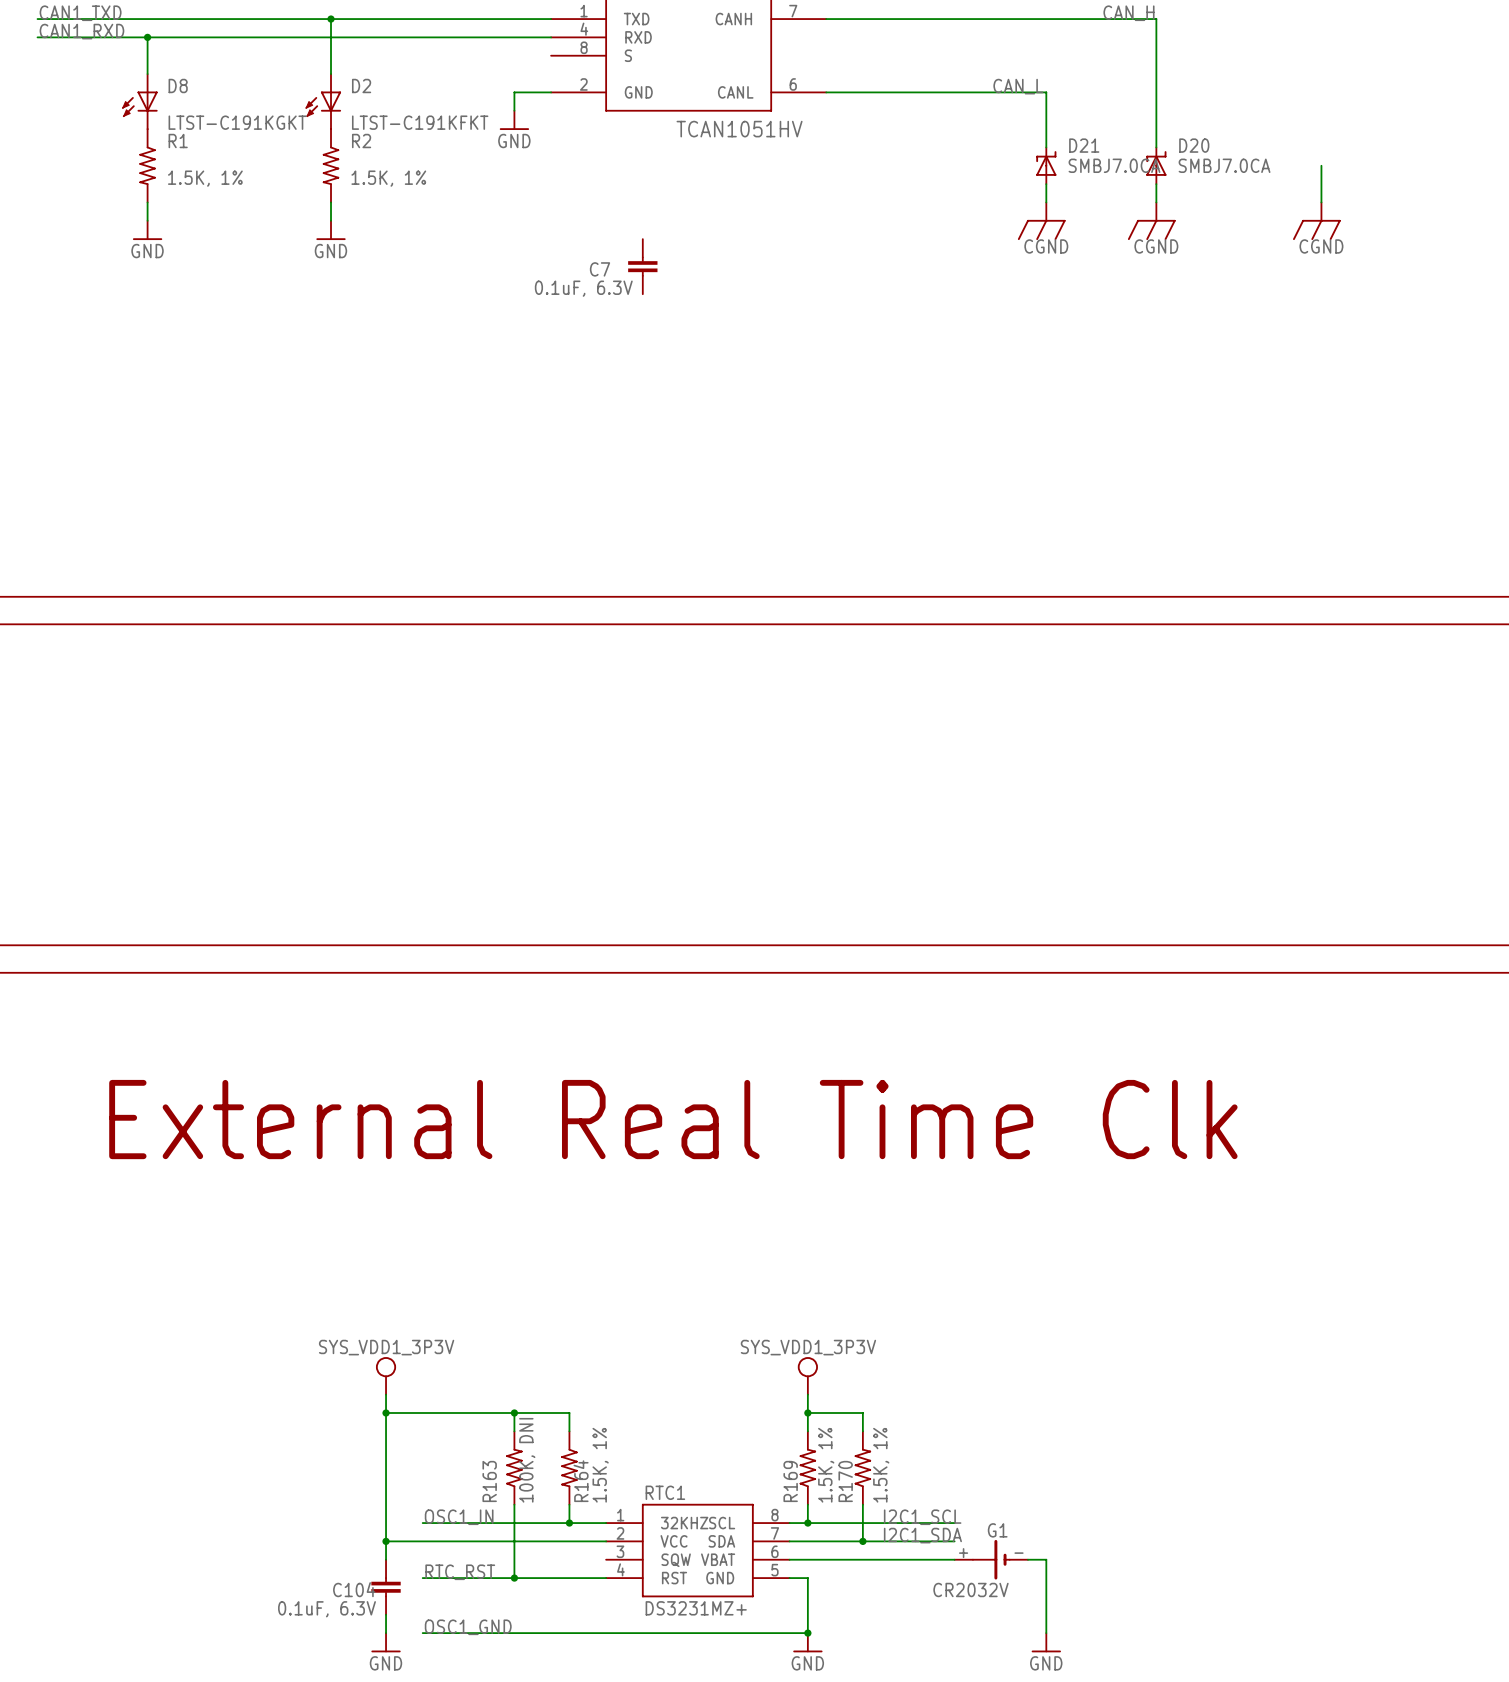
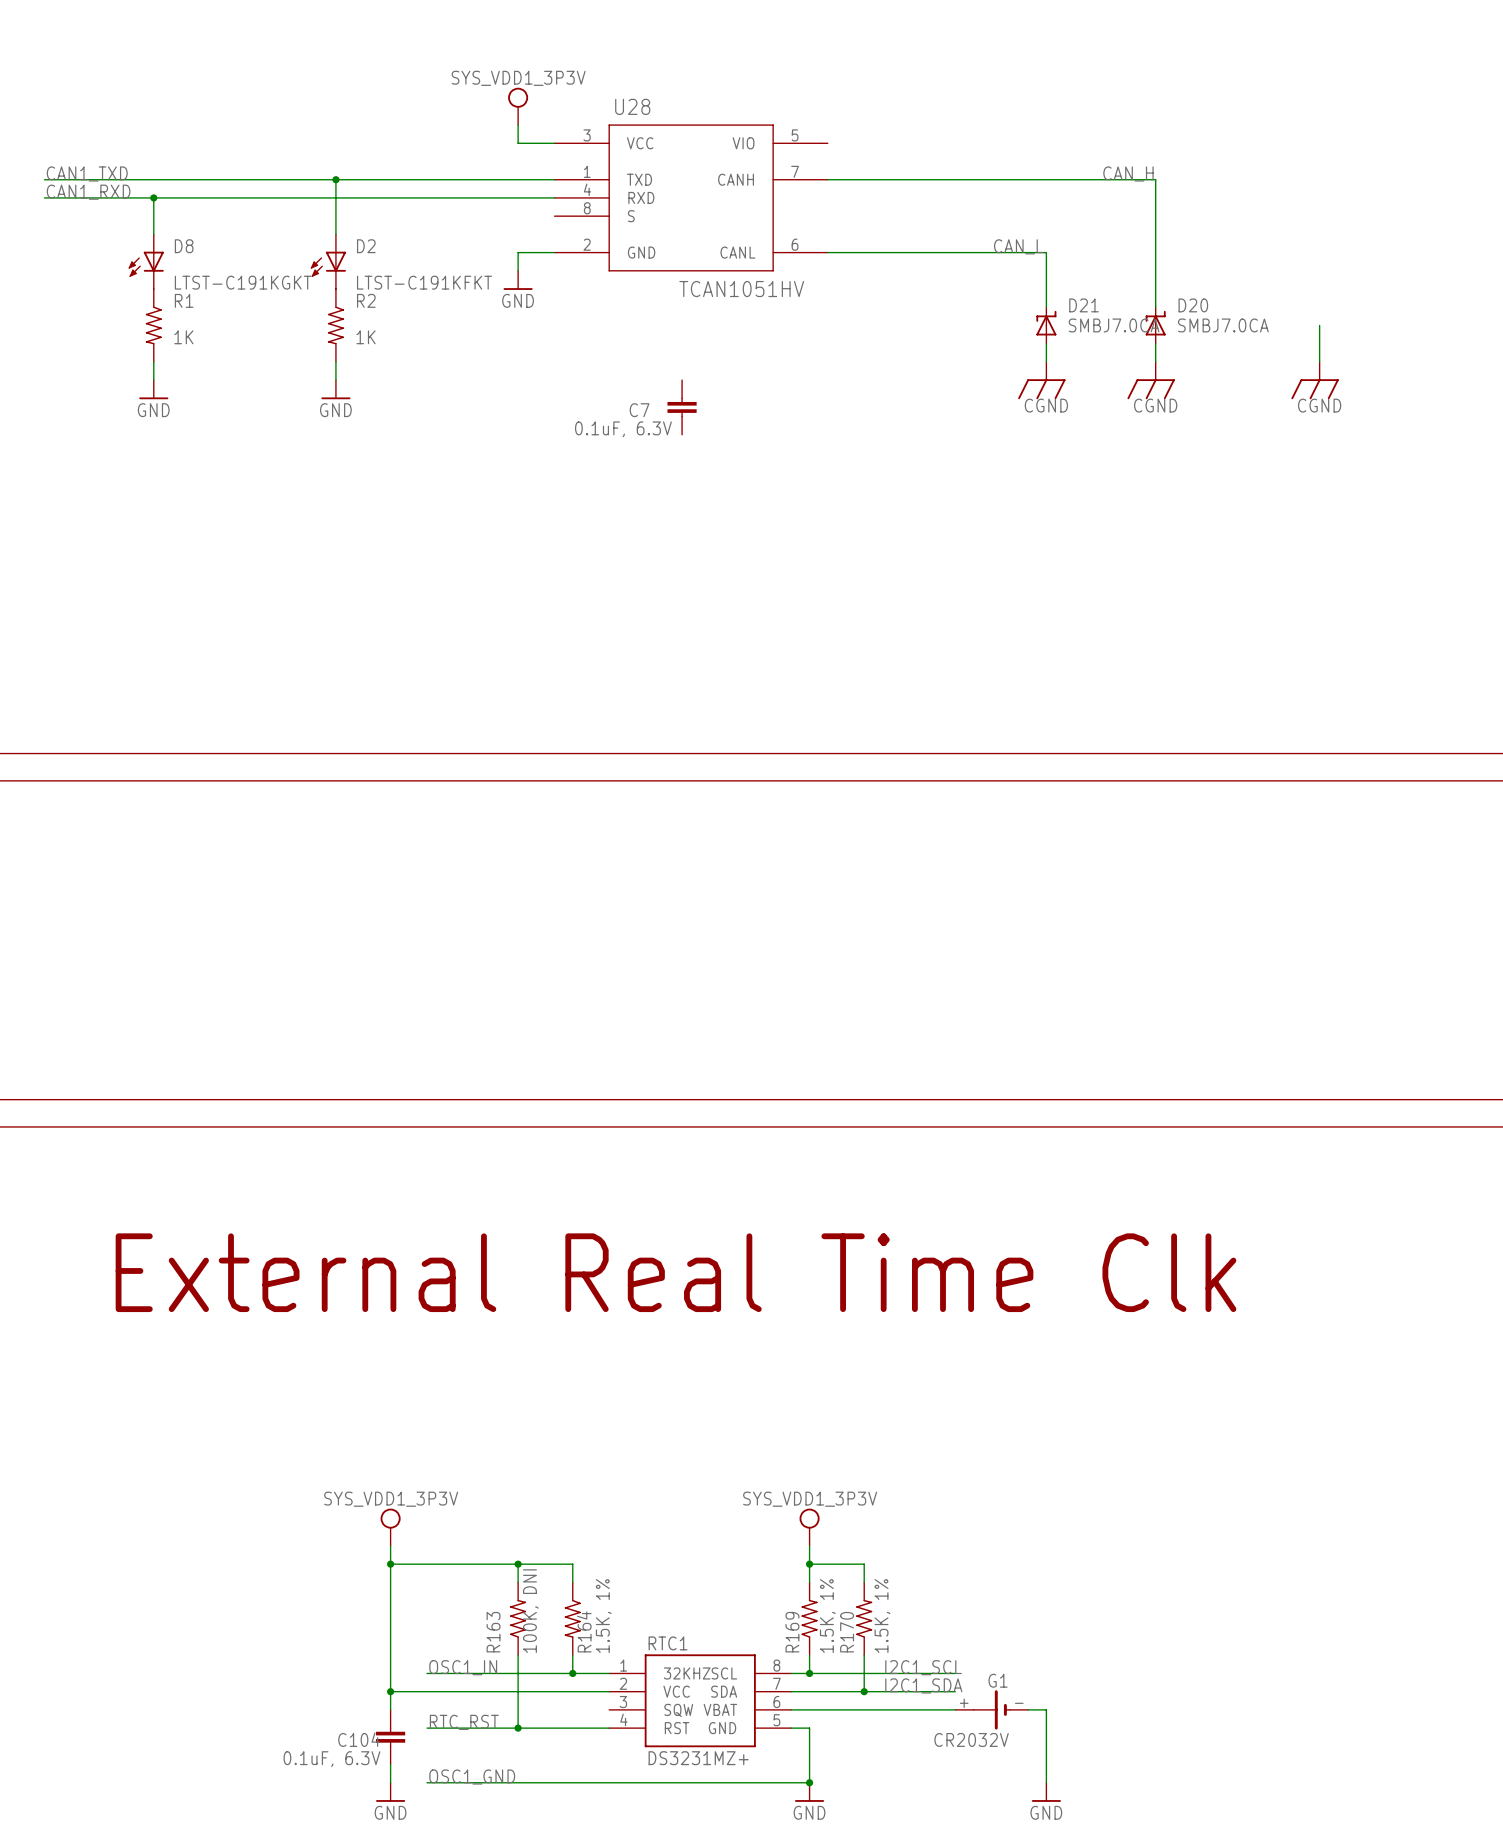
R1 value: 1.5K, 1% (205, 178) -> 1K (183, 337)
R2 value: 1.5K, 1% (388, 178) -> 1K (366, 337)
C7 position: (642, 266) -> (682, 407)

